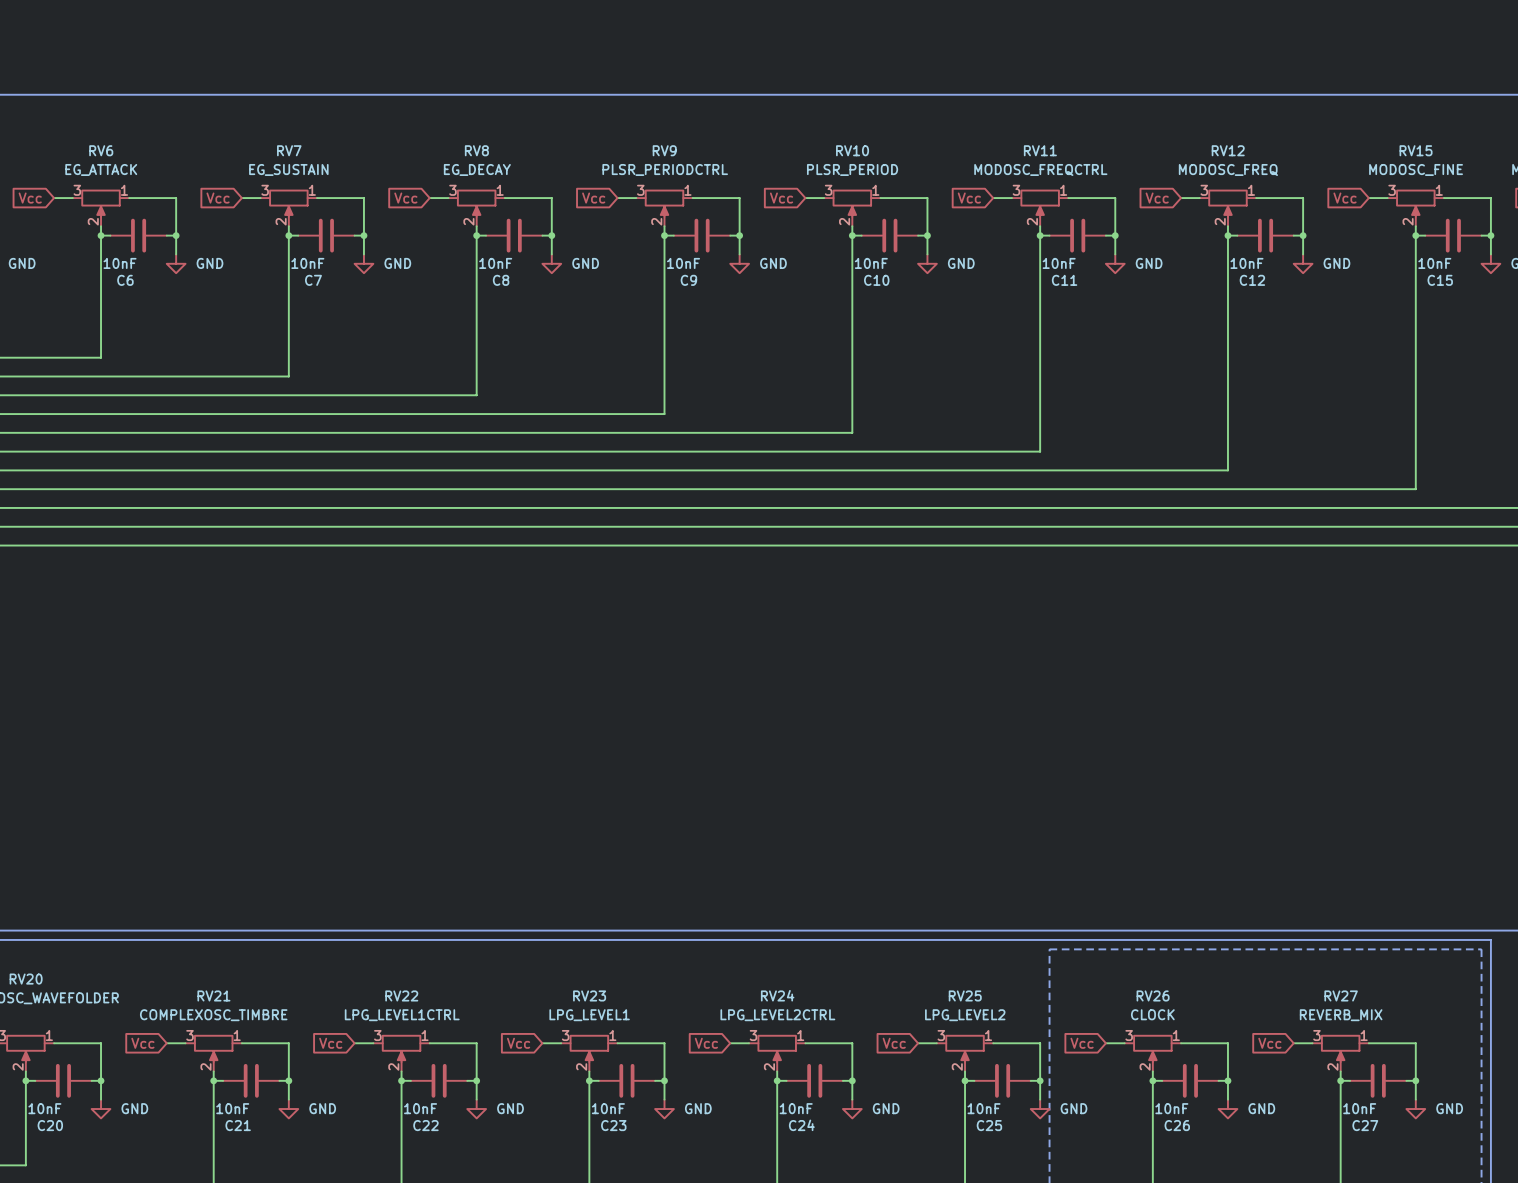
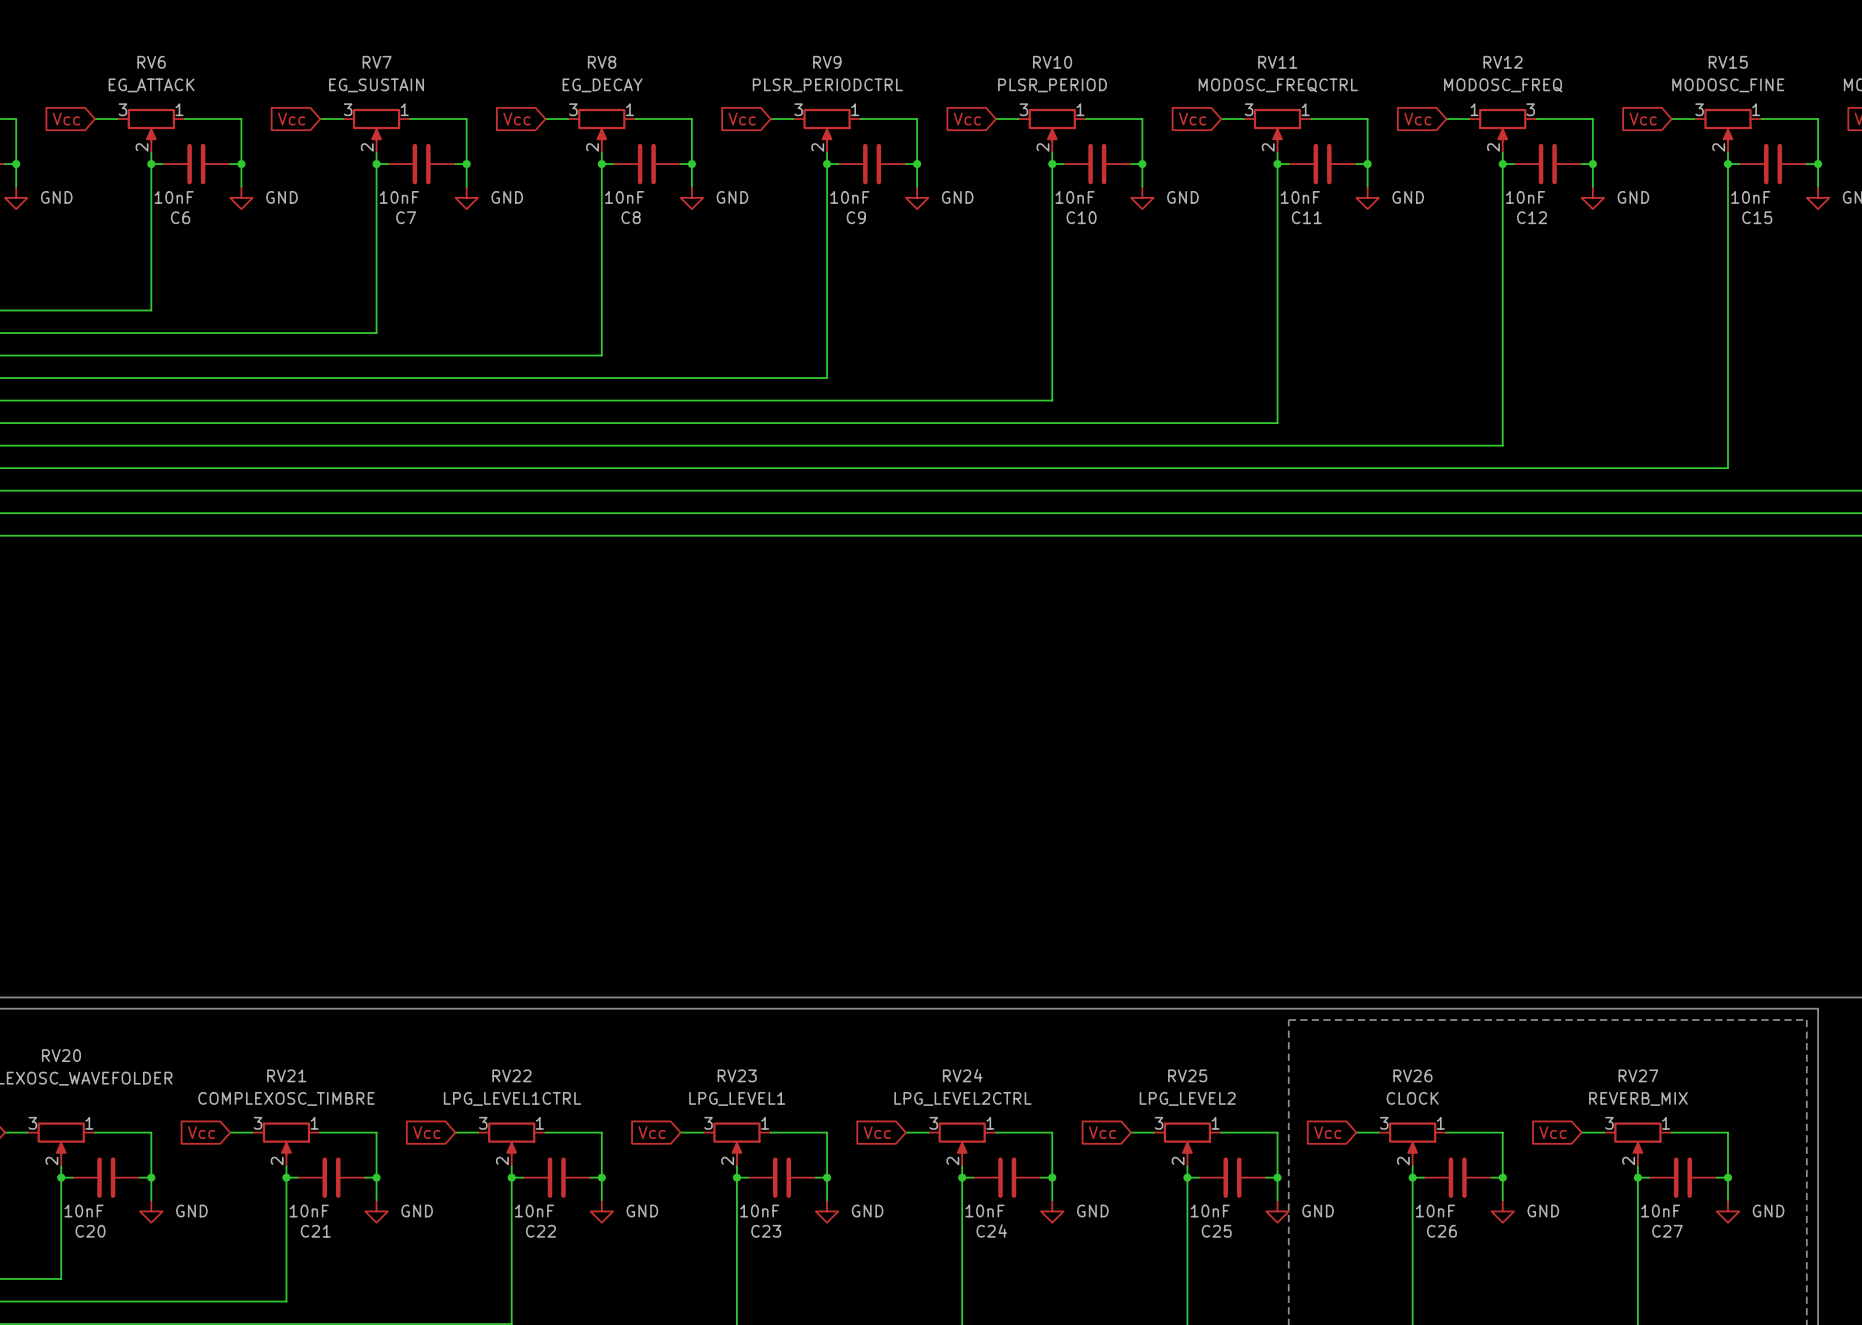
RV12 flip: as is (1227, 203) -> left-right (1502, 125)

